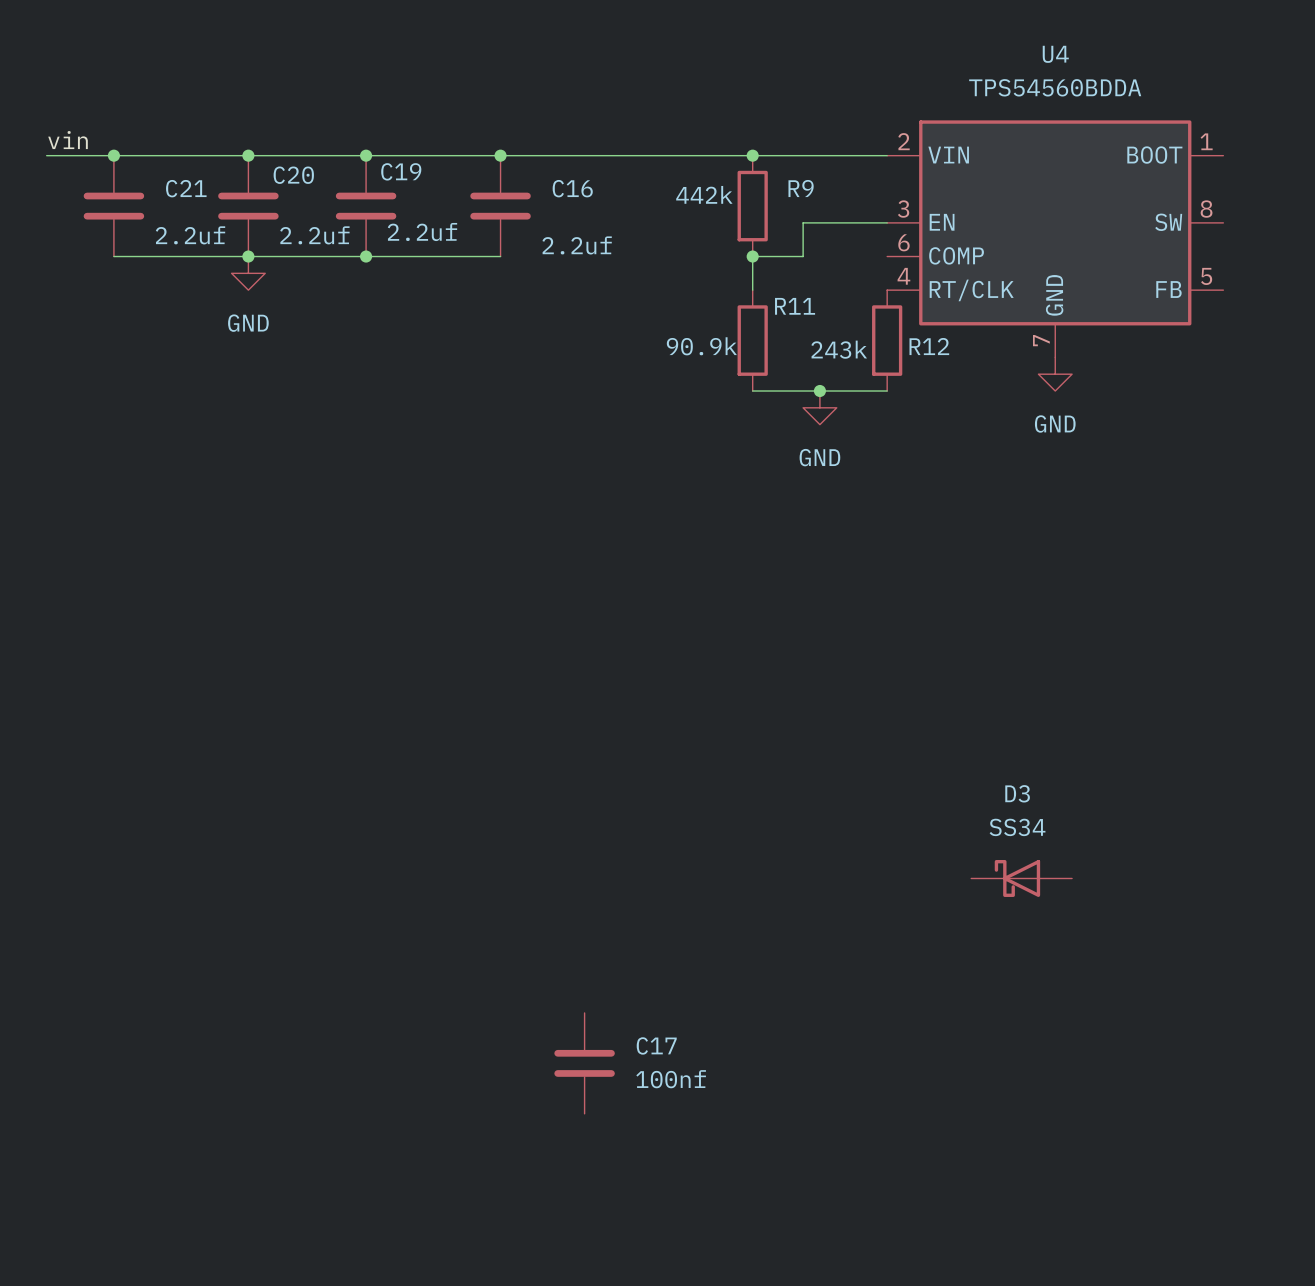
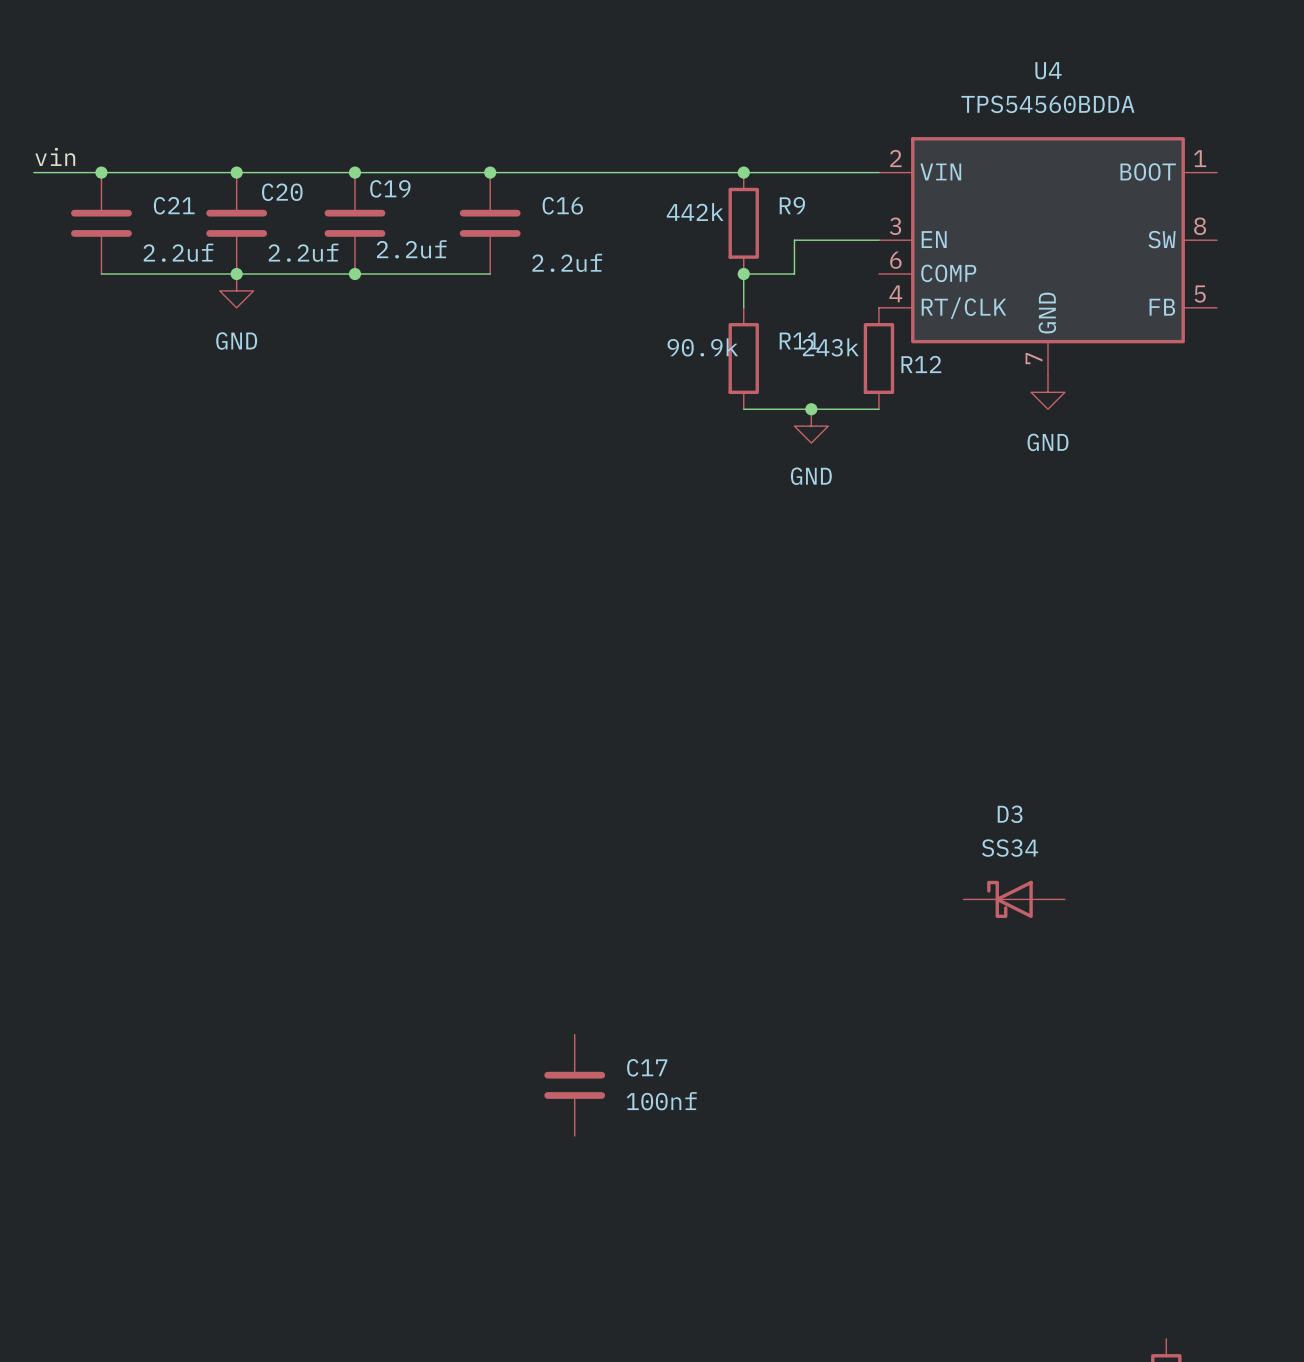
R11 name position: R11 (795, 306) -> R11 (799, 340)
R11 value position: 90.9k (701, 346) -> 90.9k (702, 347)
R12 value position: 243k (839, 349) -> 243k (830, 347)

